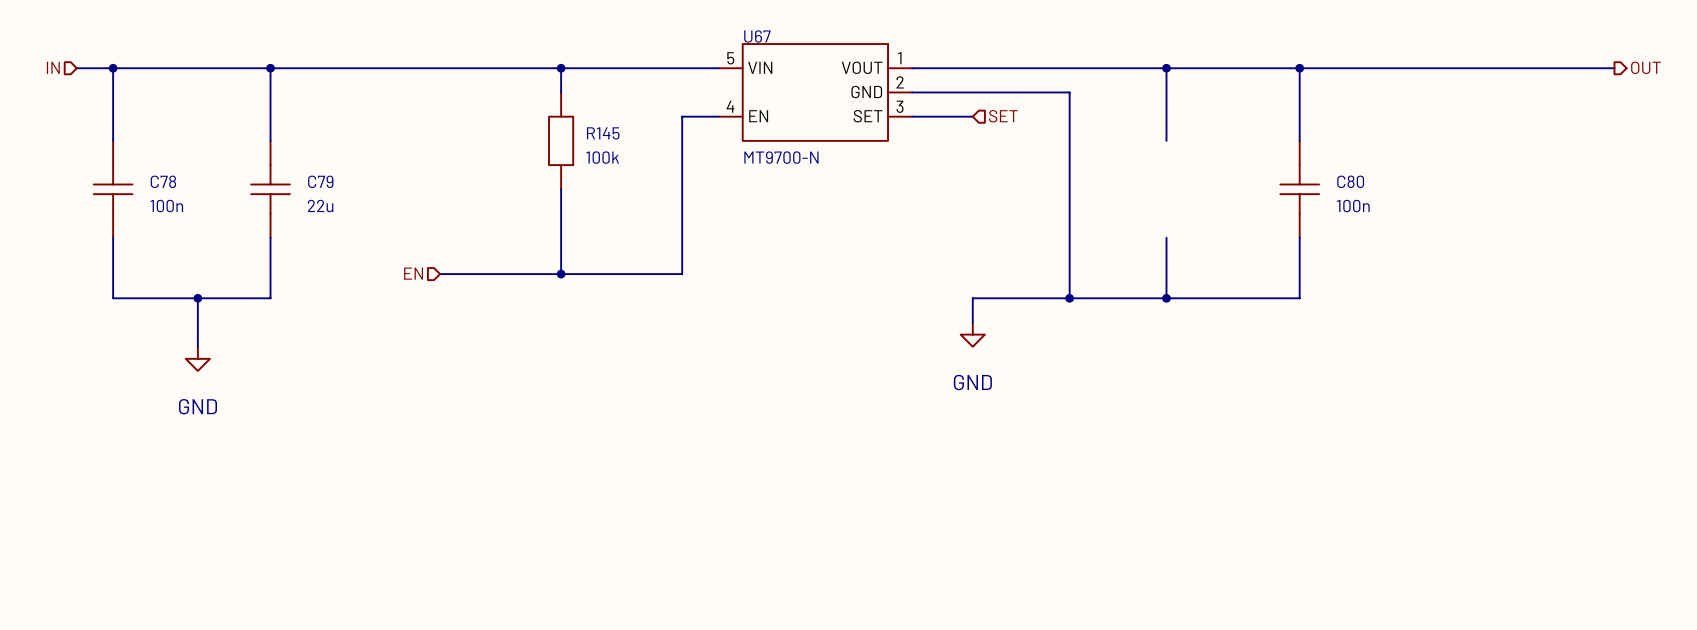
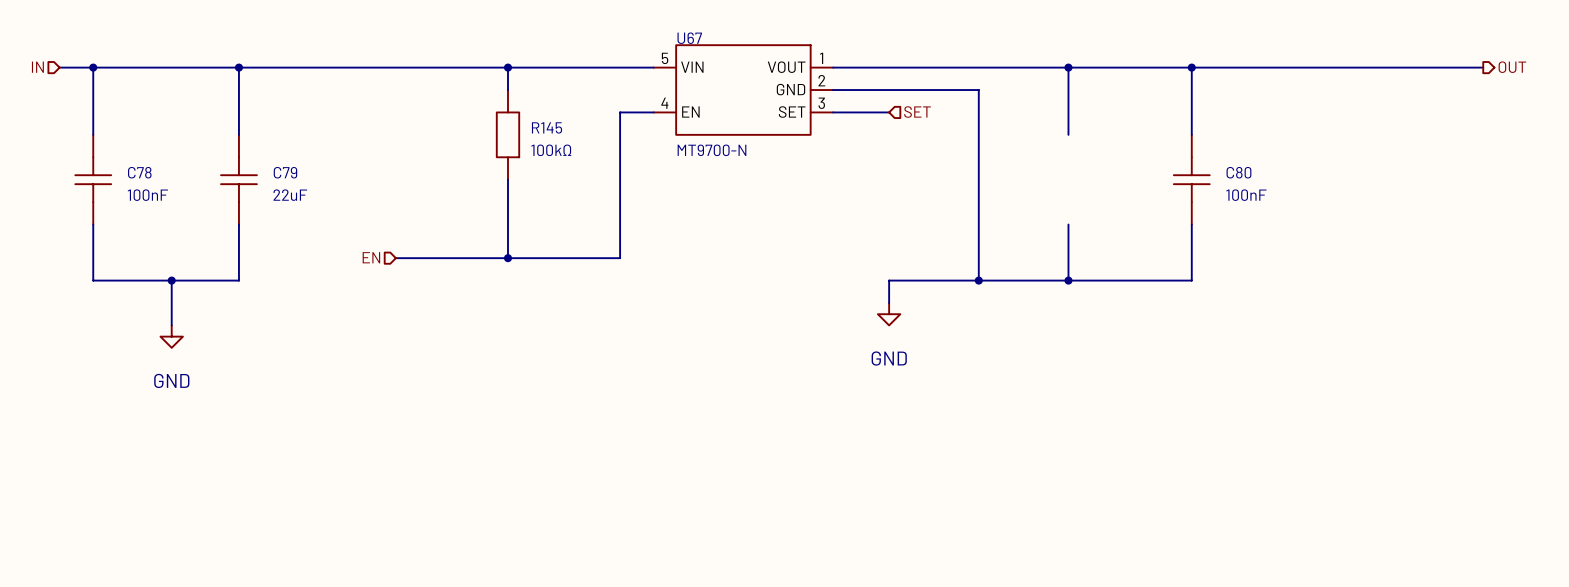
R145 value: 100k (602, 157) -> 100kΩ (551, 150)
C78 value: 100n (166, 206) -> 100nF (147, 195)
C79 value: 22u (320, 206) -> 22uF (290, 195)
C80 value: 100n (1353, 206) -> 100nF (1246, 195)

